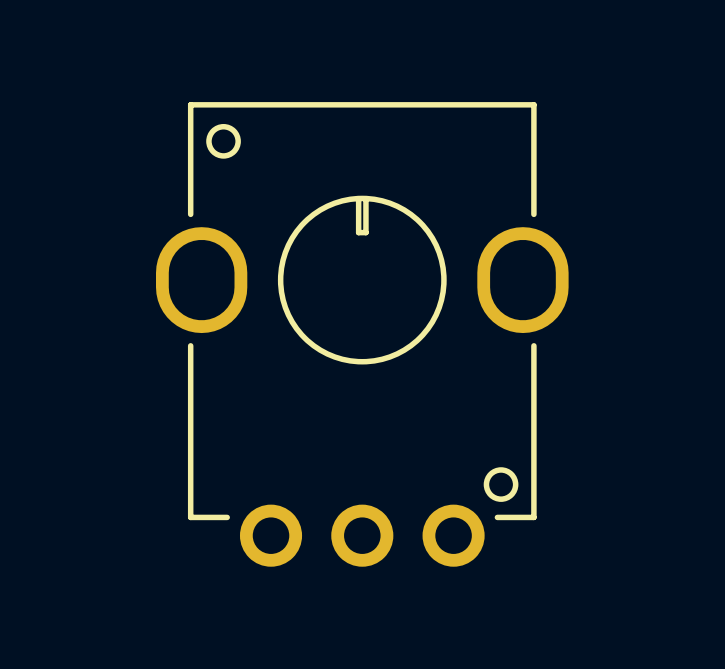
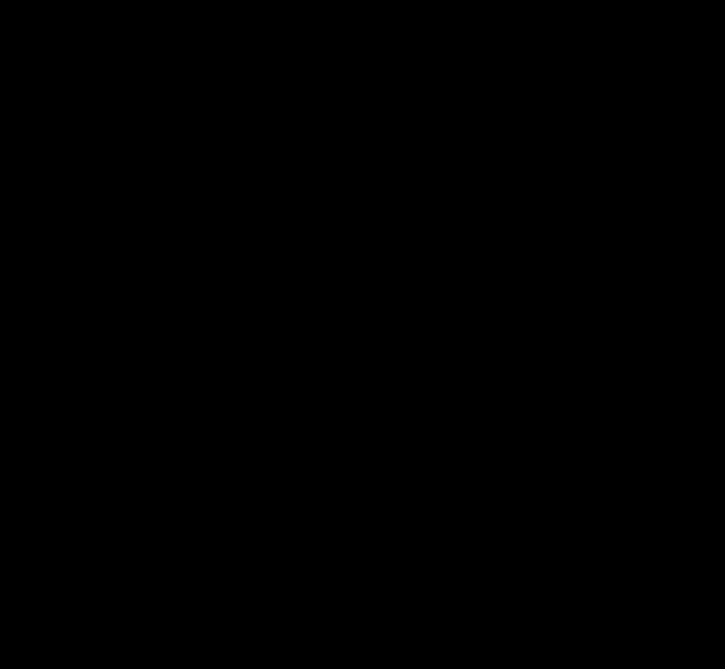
part: (362, 334) -> none

